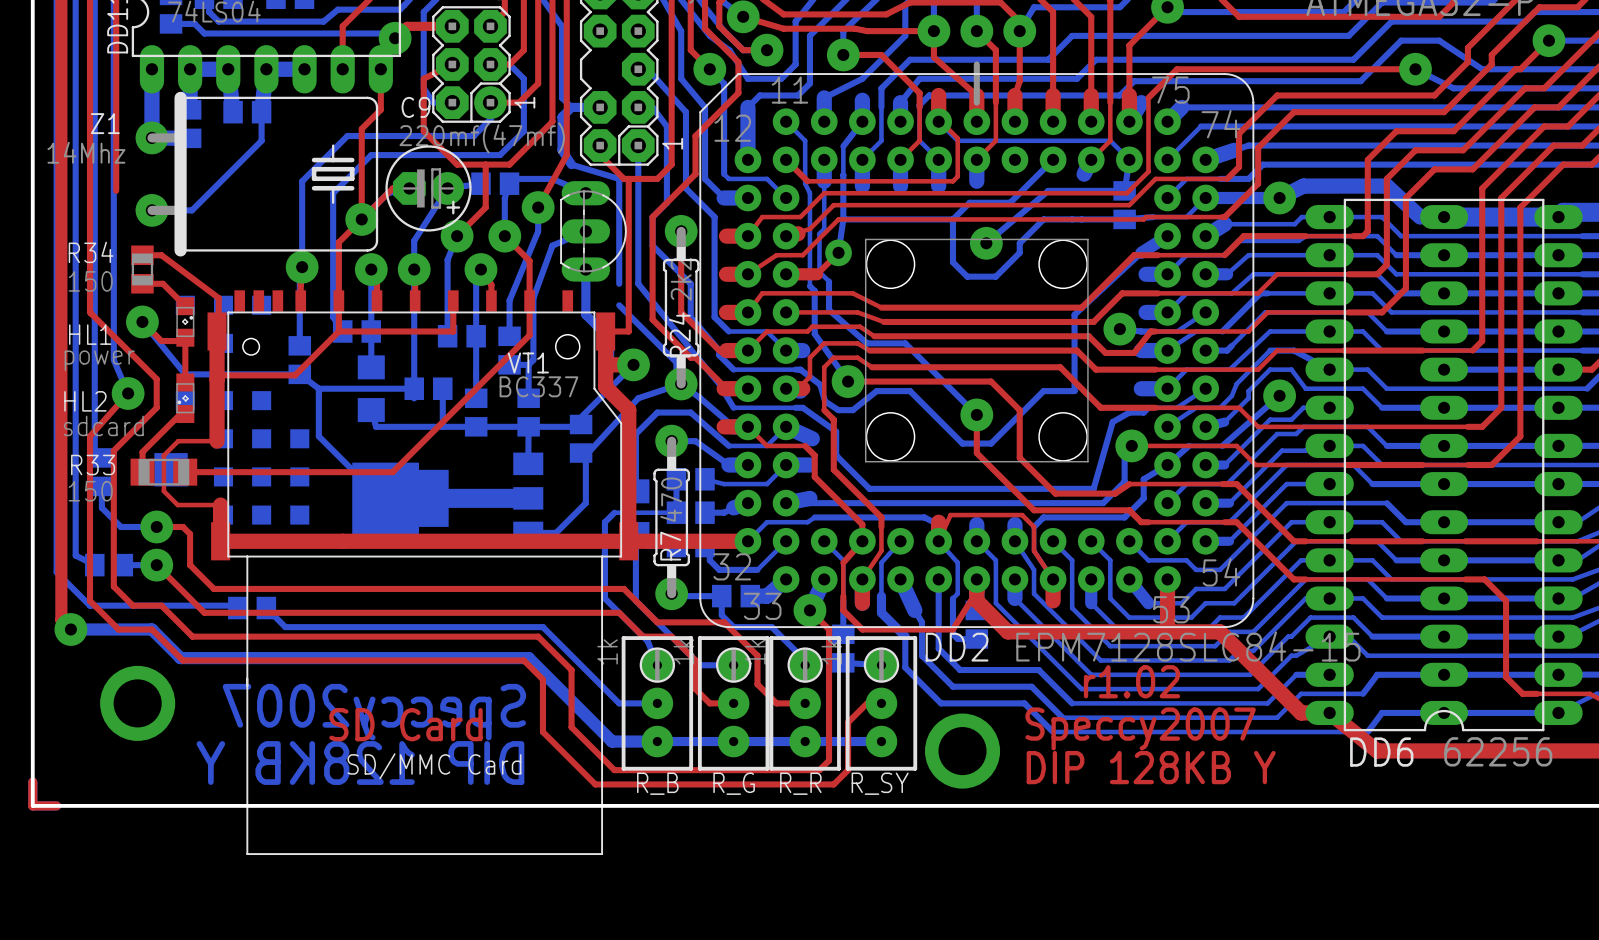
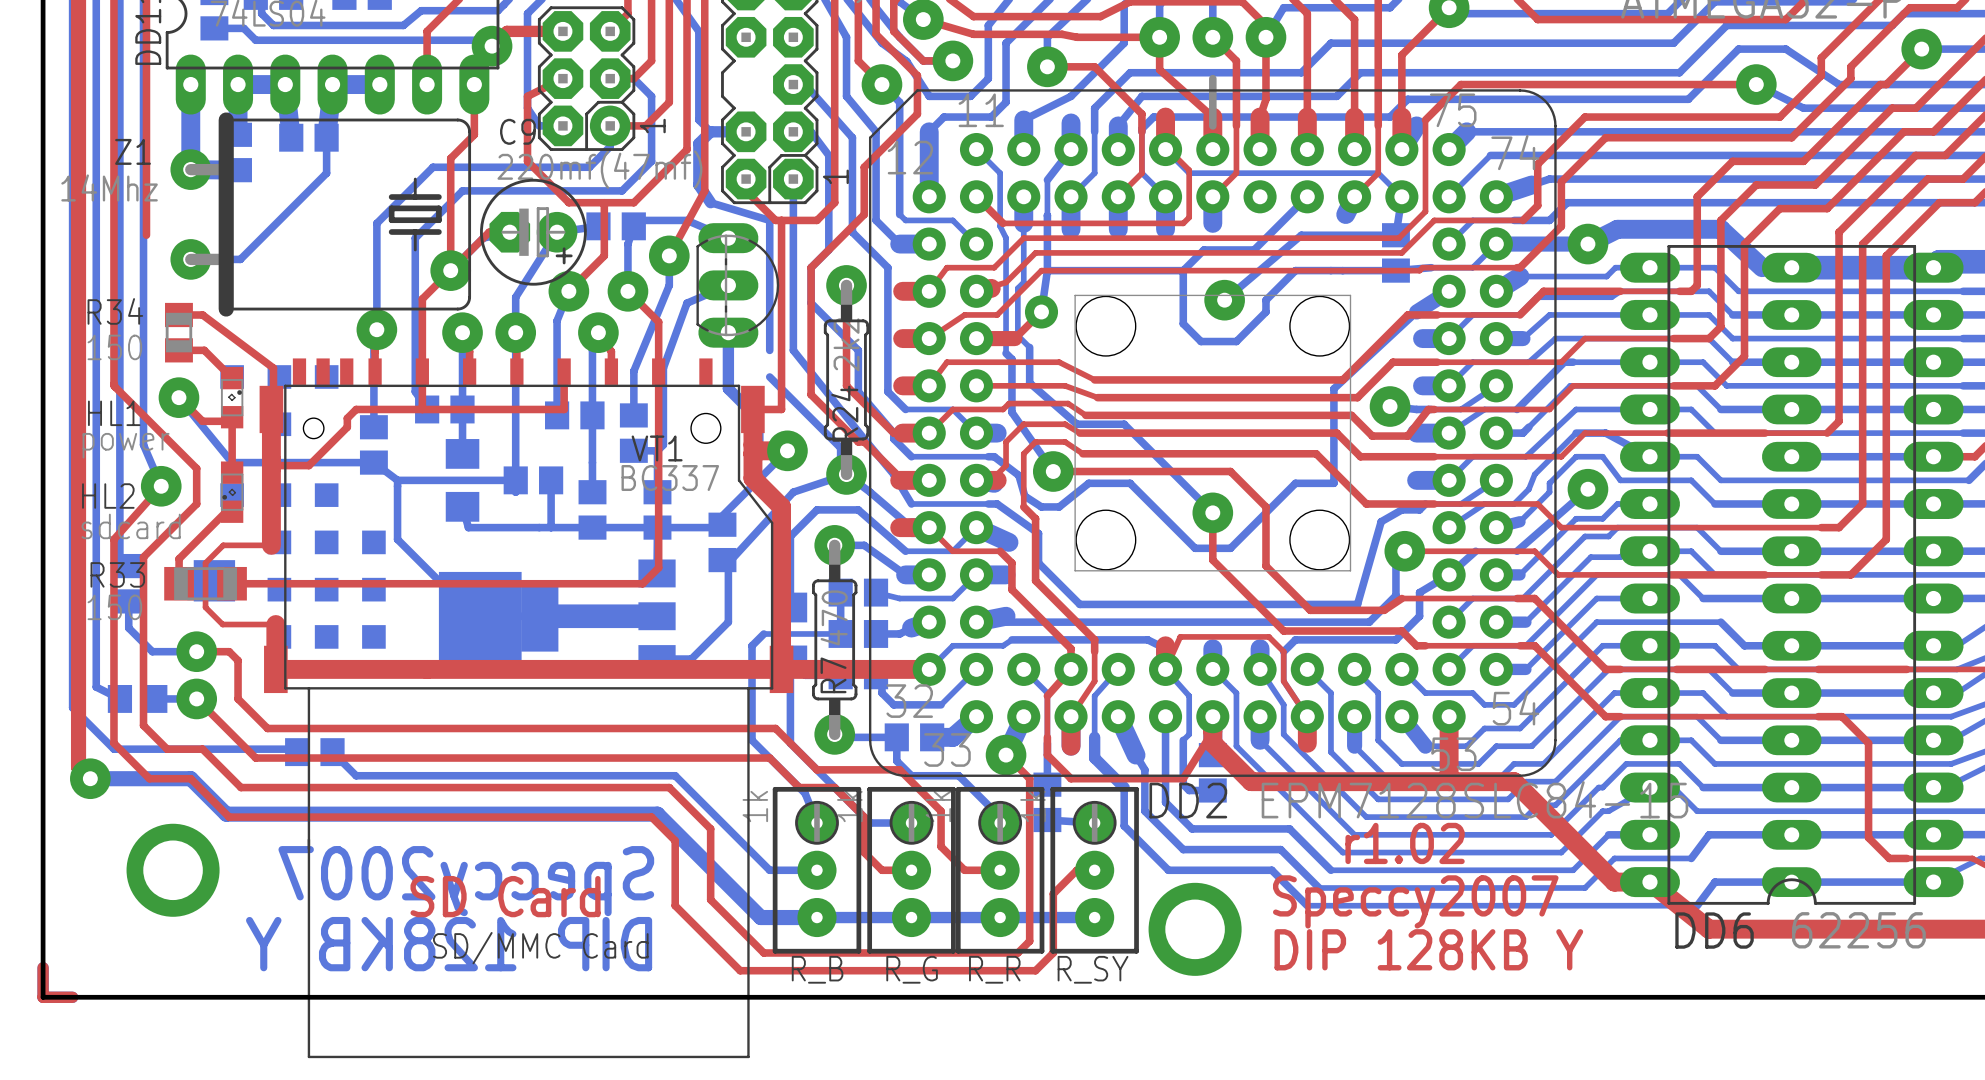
top track: (338, 331) (295, 375) (221, 375) -> (422, 409) (356, 409) (347, 418) (347, 427) (308, 465) (271, 465) (271, 459)
top track: (529, 335) (392, 472) -> (658, 414) (658, 567) (642, 583) (489, 583)

